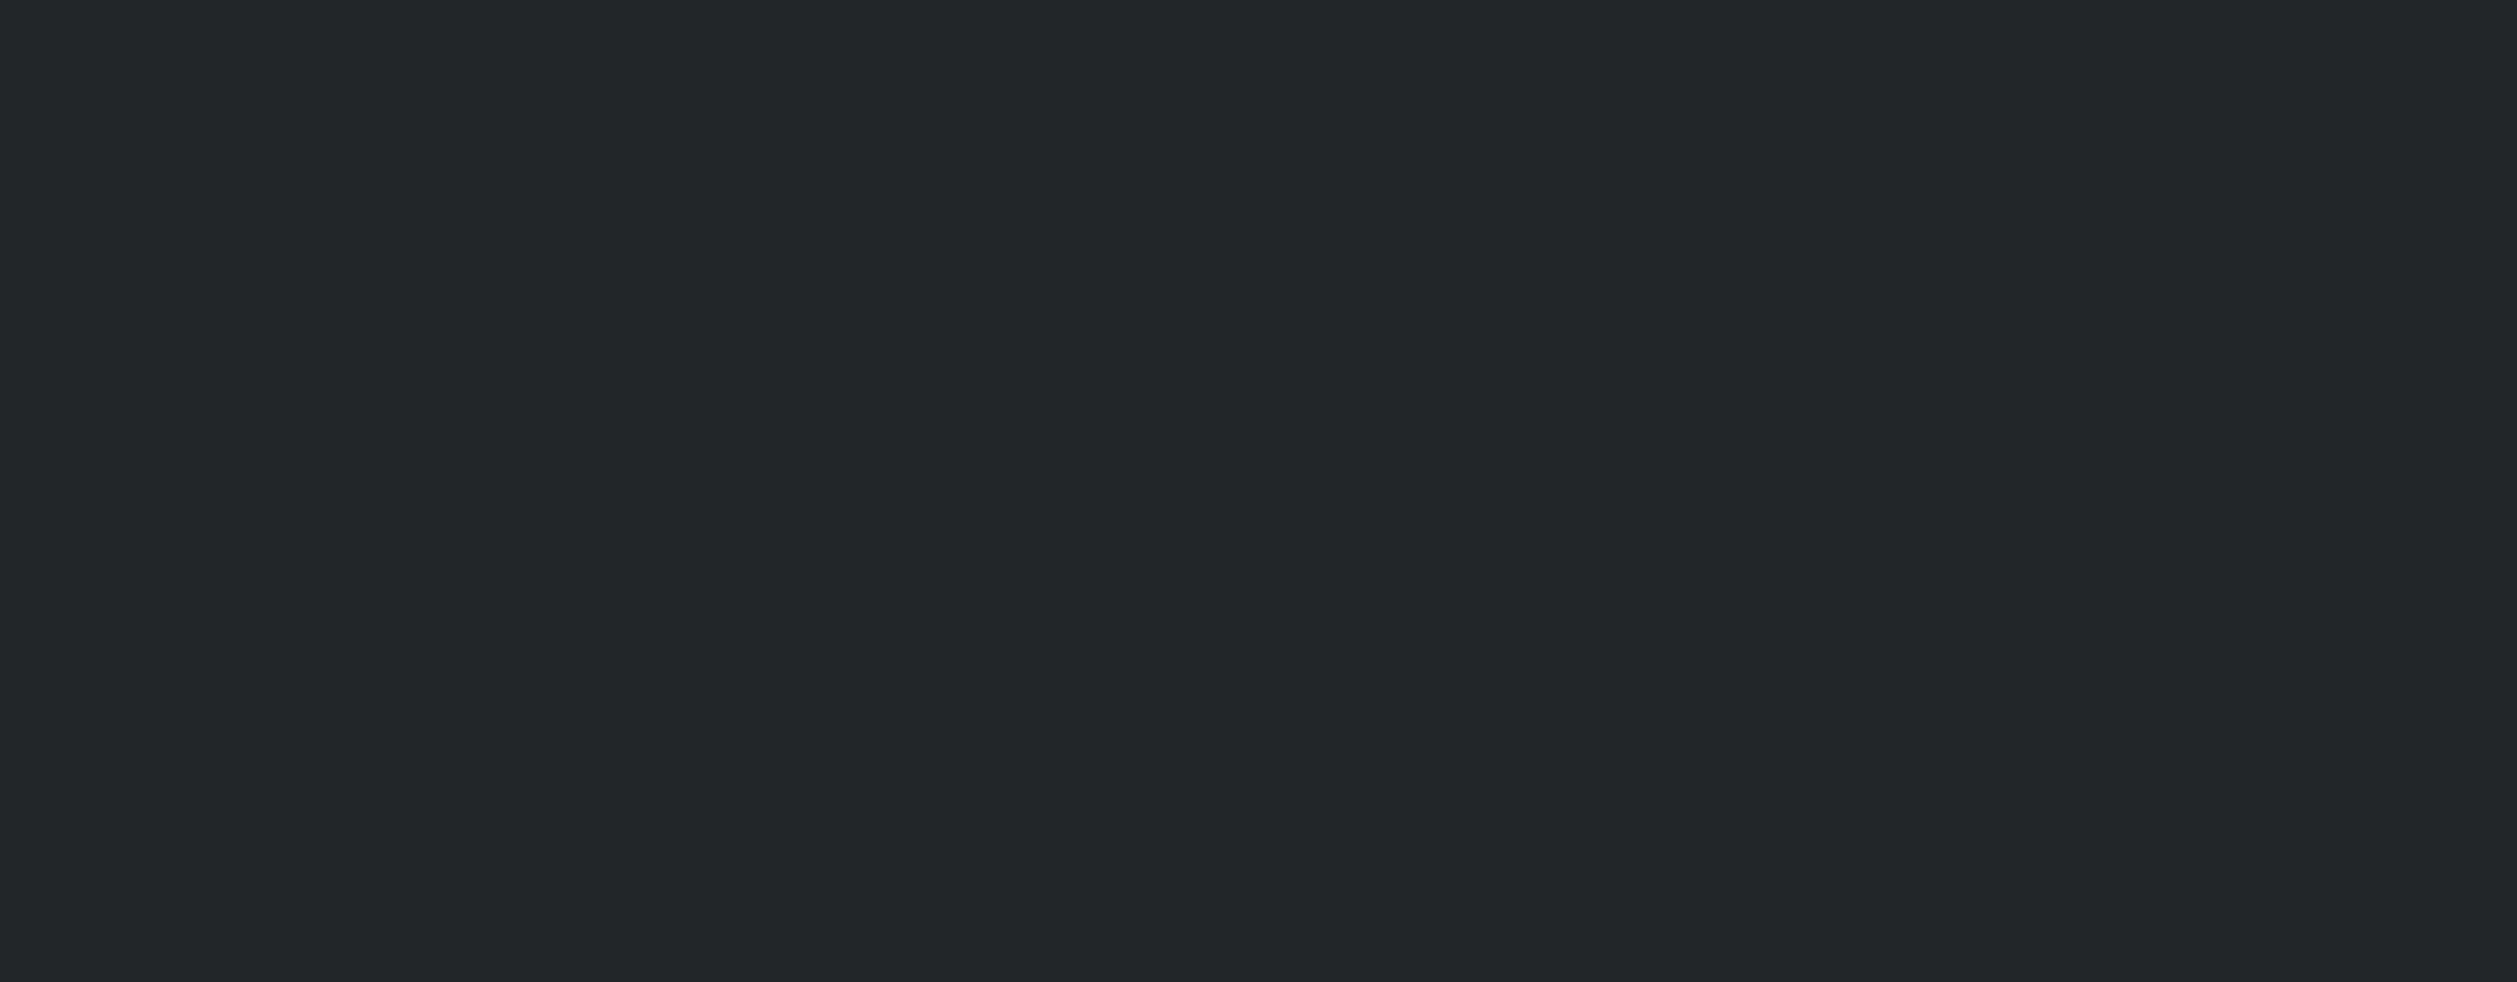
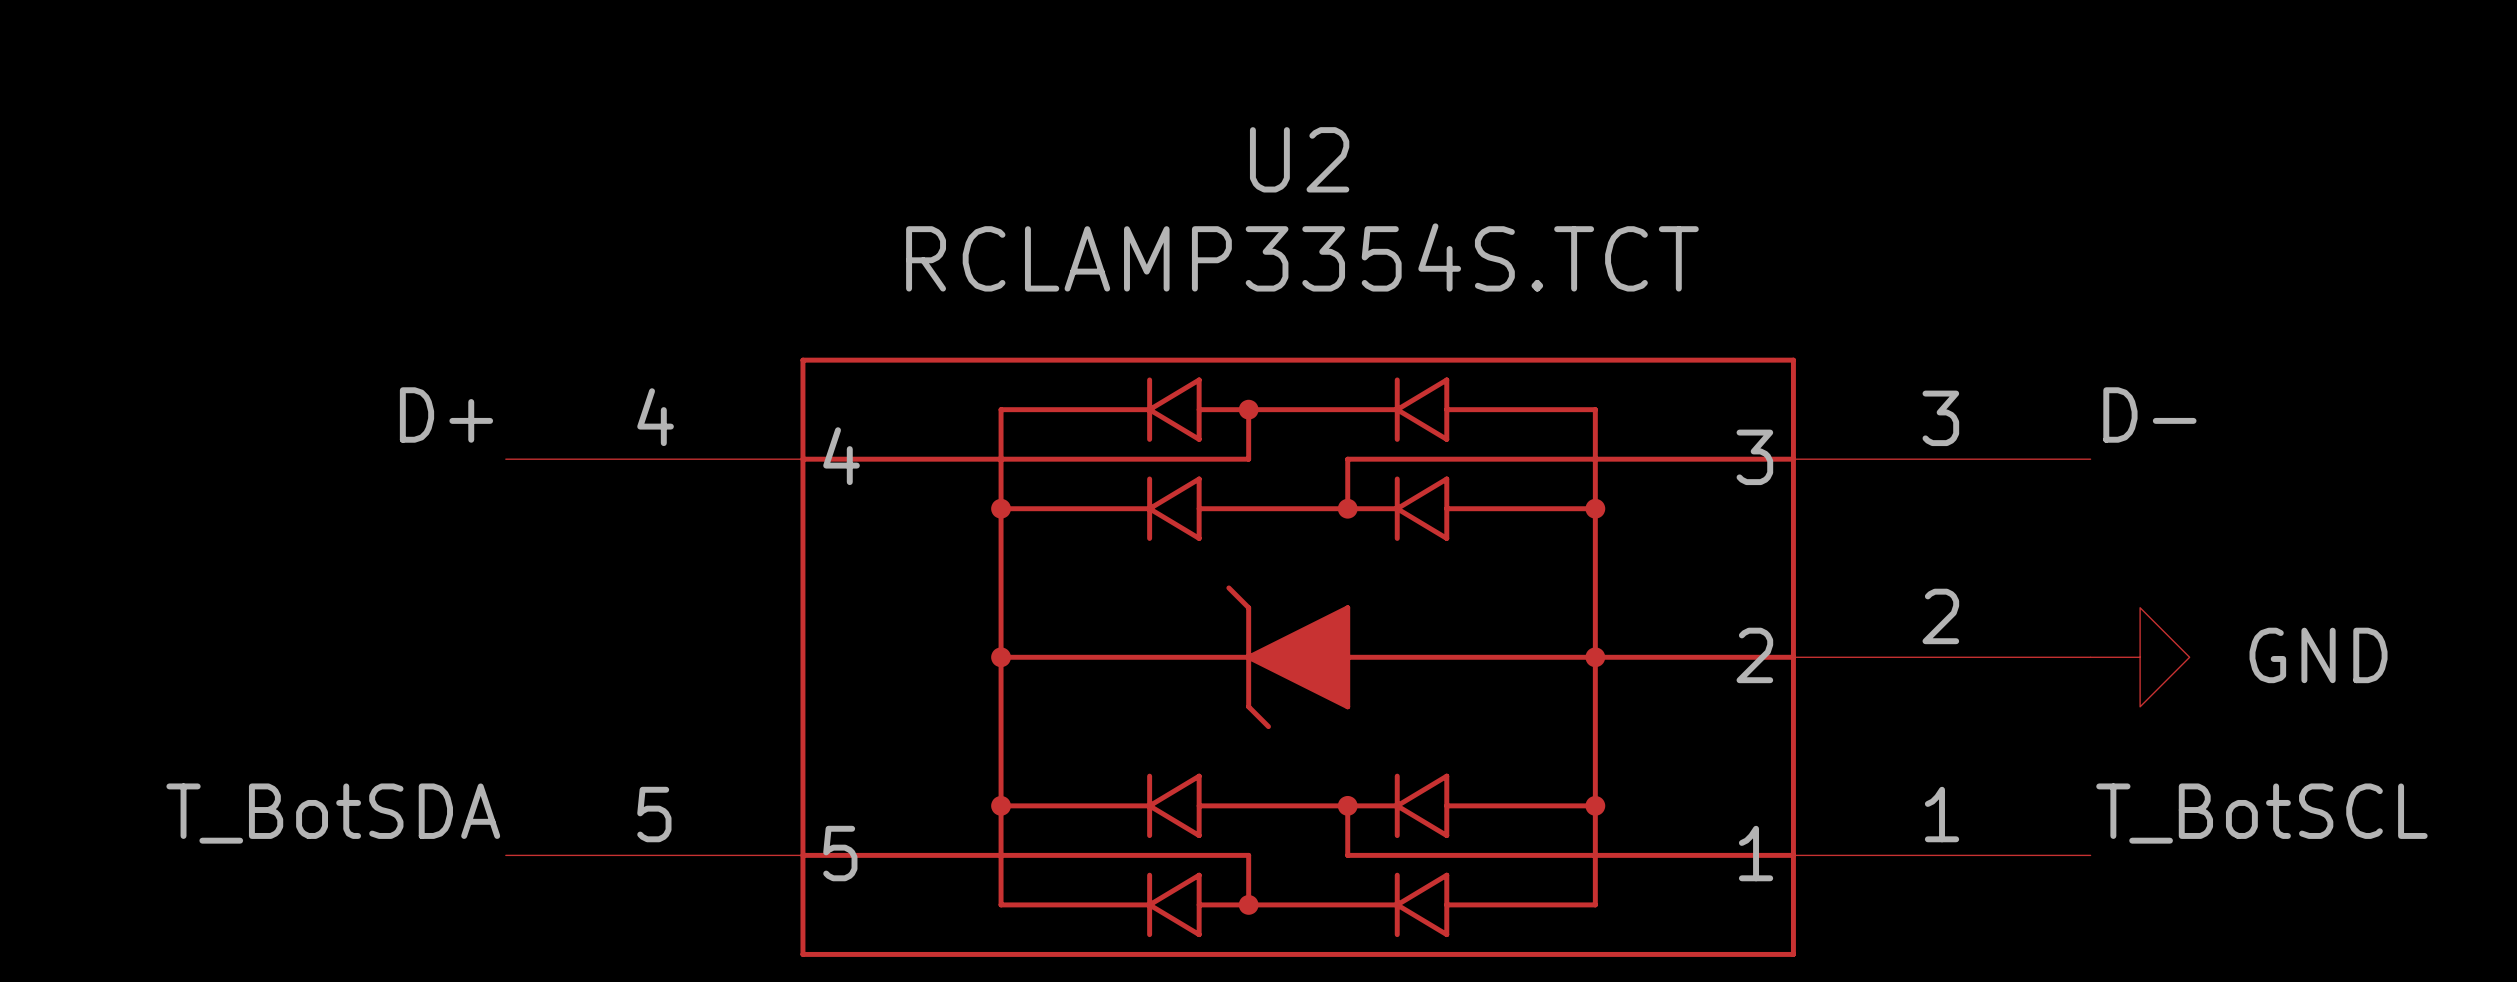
label: none -> D+ (446, 415)
label: none -> D- (2149, 415)
U2: none -> RCLAMP3354S.TCT (1298, 657)
power symbol: none -> GND (2140, 657)
label: none -> T_BotSDA (333, 813)
label: none -> T_BotSCL (2261, 813)

